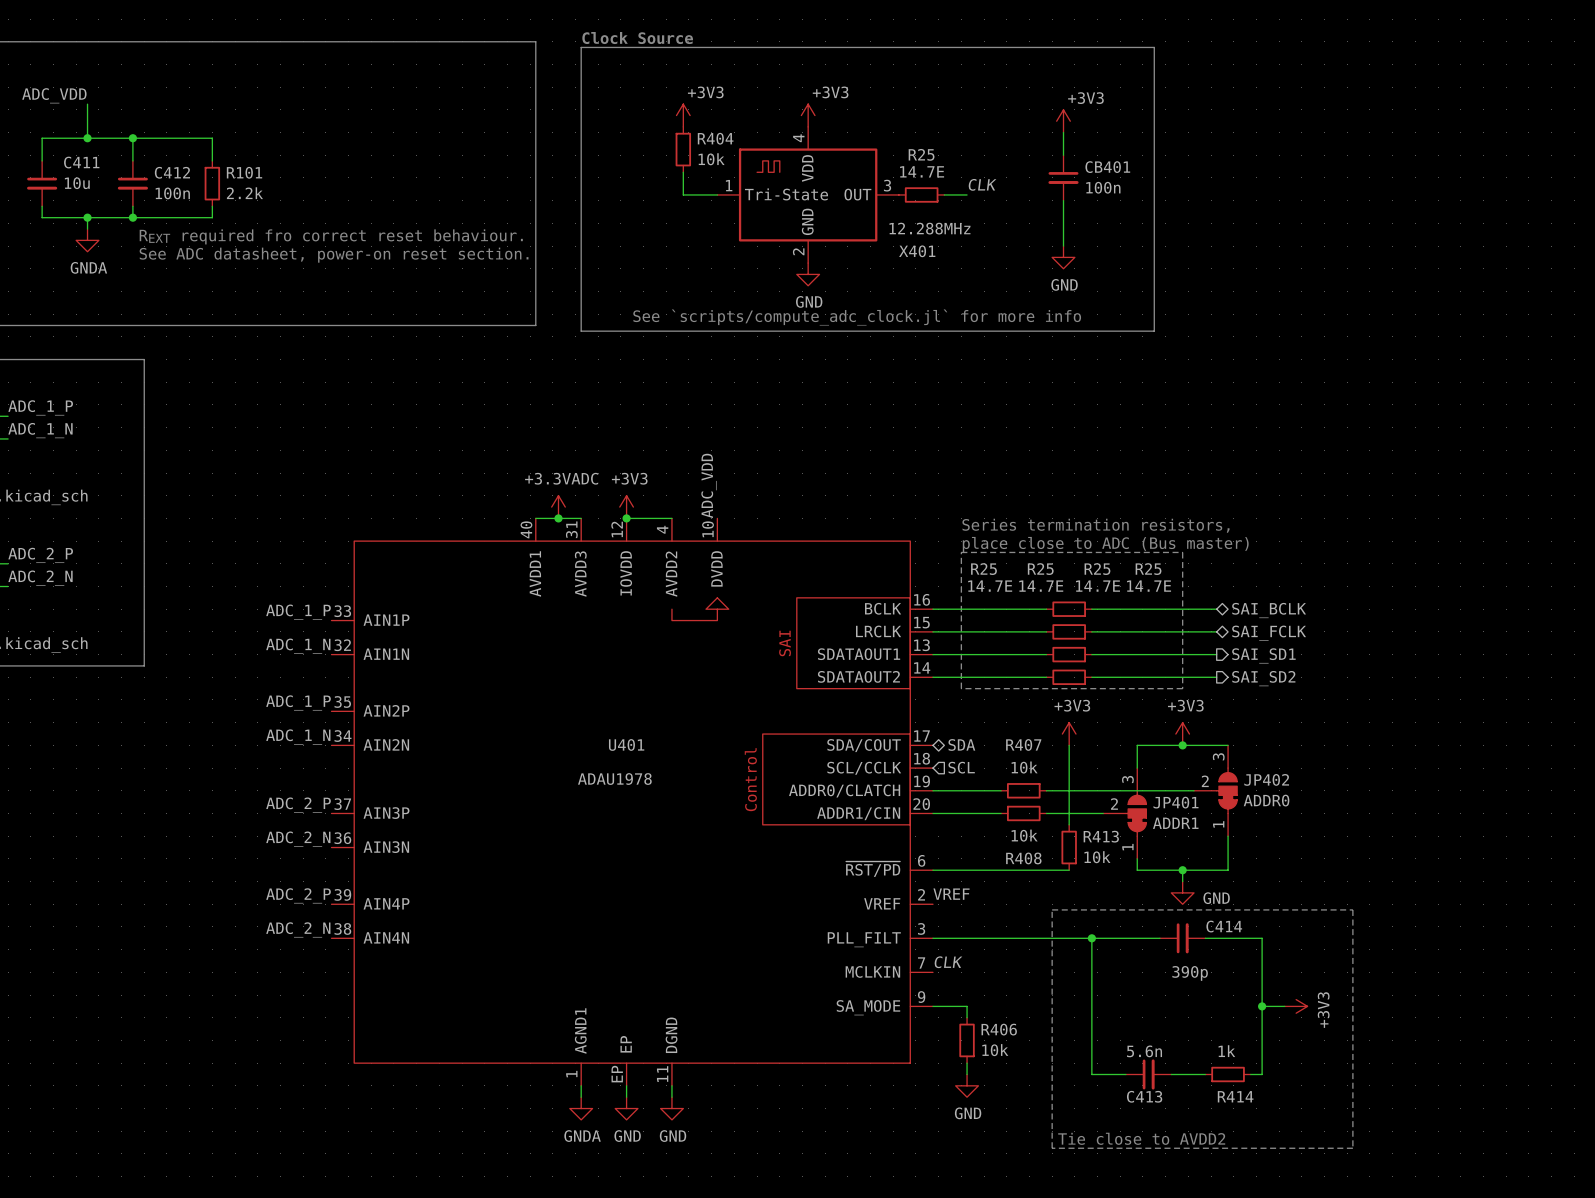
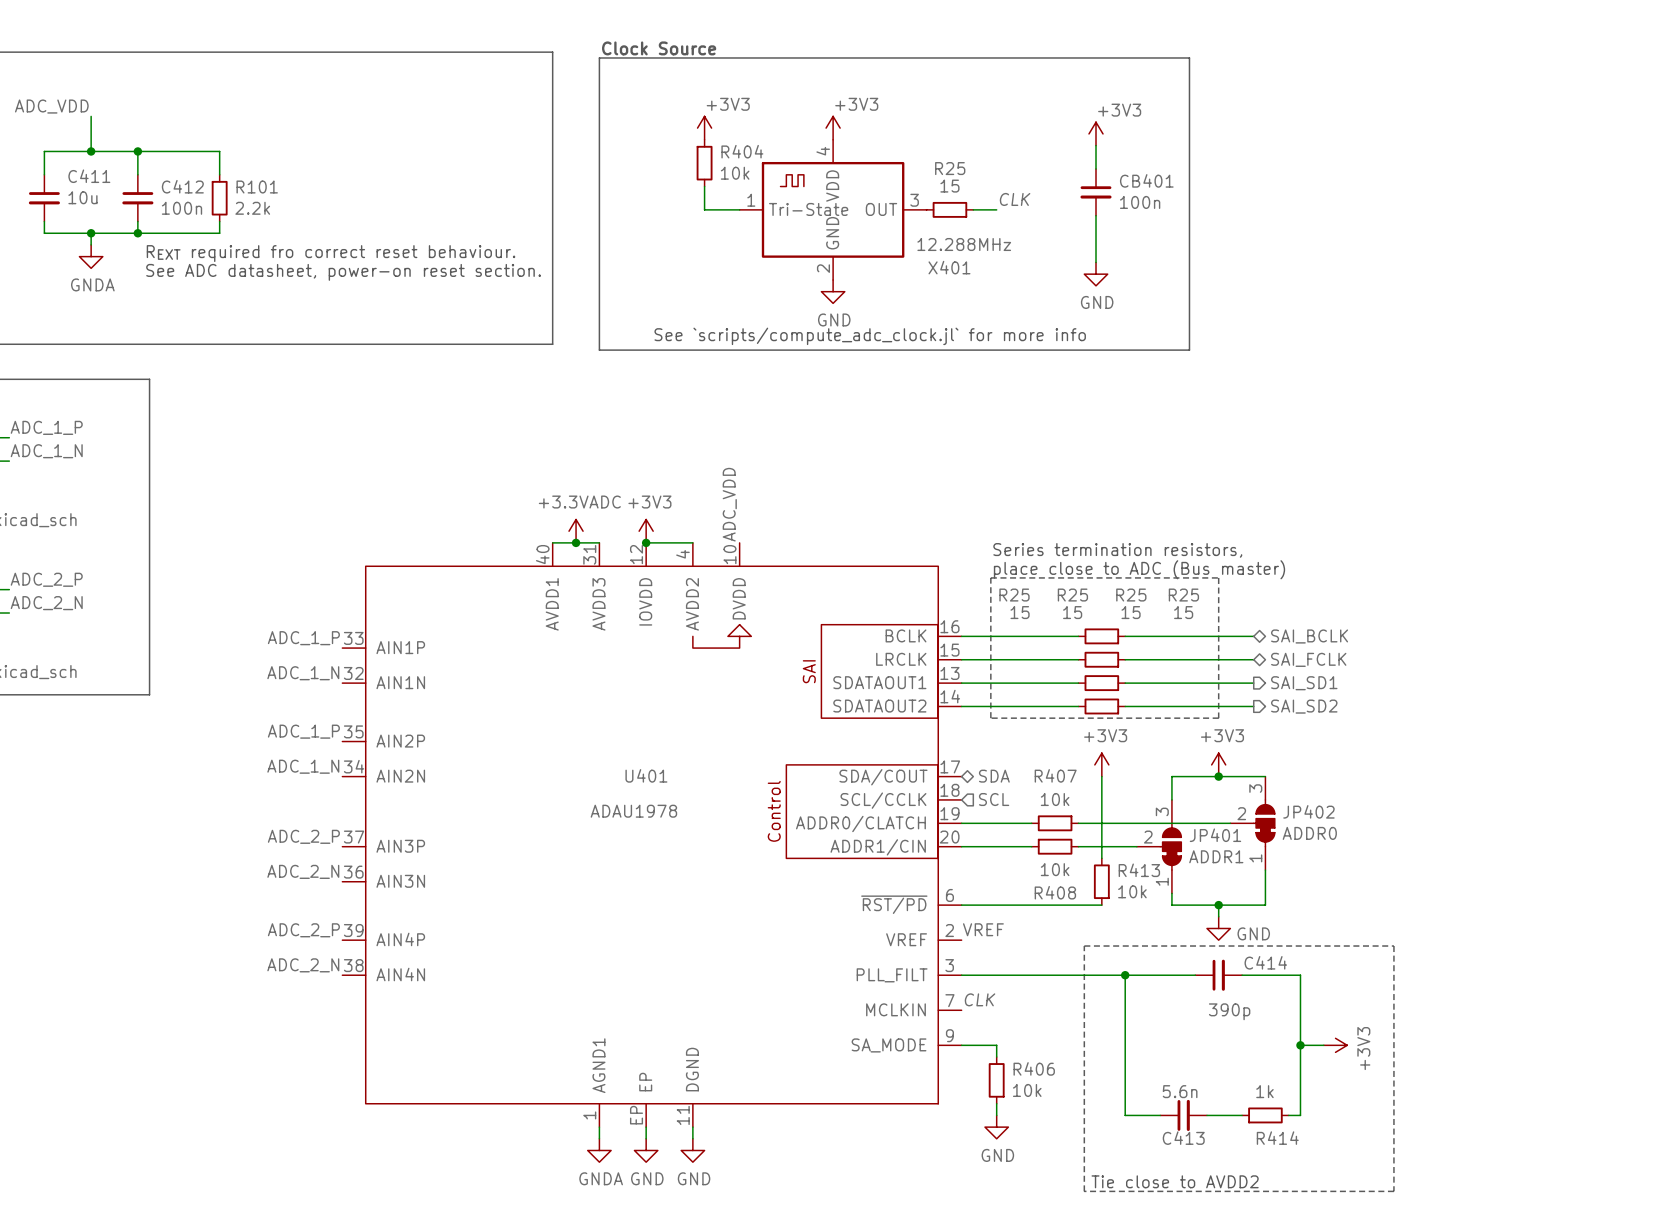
R25 value: 14.7E (922, 171) -> 15 (949, 186)
R25 value: 14.7E (990, 586) -> 15 (1020, 612)
R25 value: 14.7E (1041, 586) -> 15 (1072, 612)
R25 value: 14.7E (1097, 586) -> 15 (1131, 612)
R25 value: 14.7E (1149, 586) -> 15 (1183, 612)

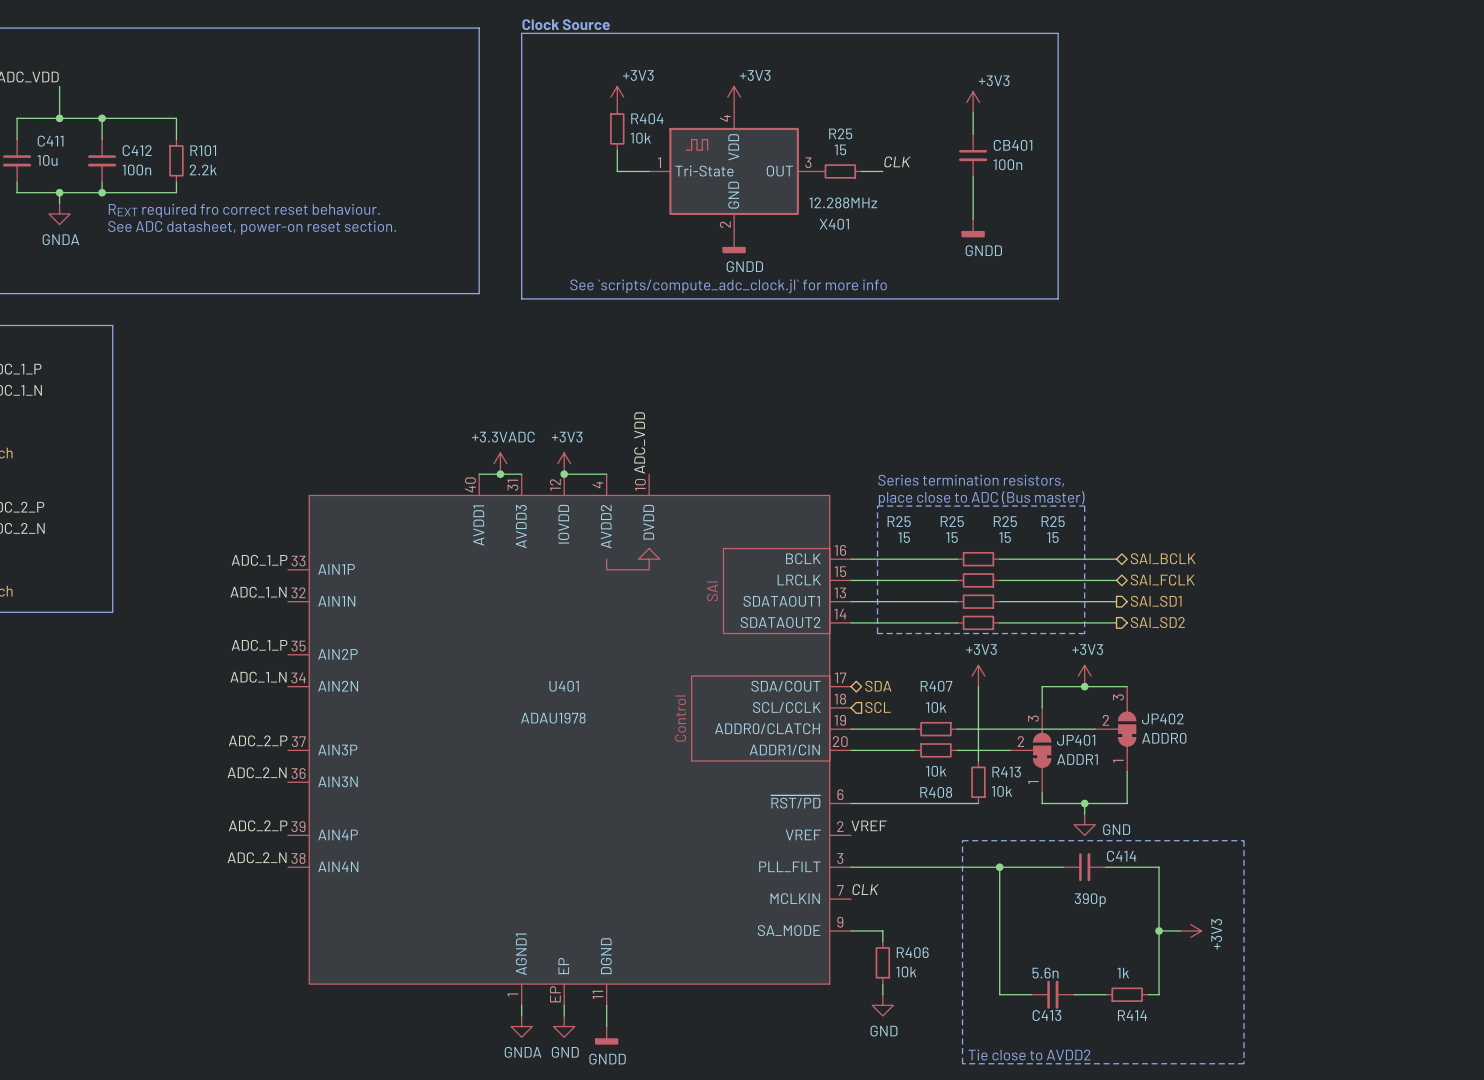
power symbol: GND (1096, 274) -> GNDD (973, 228)
power symbol: GND (833, 291) -> GNDD (734, 244)
power symbol: GND (692, 1150) -> none
power symbol: none -> GNDD (606, 1035)

